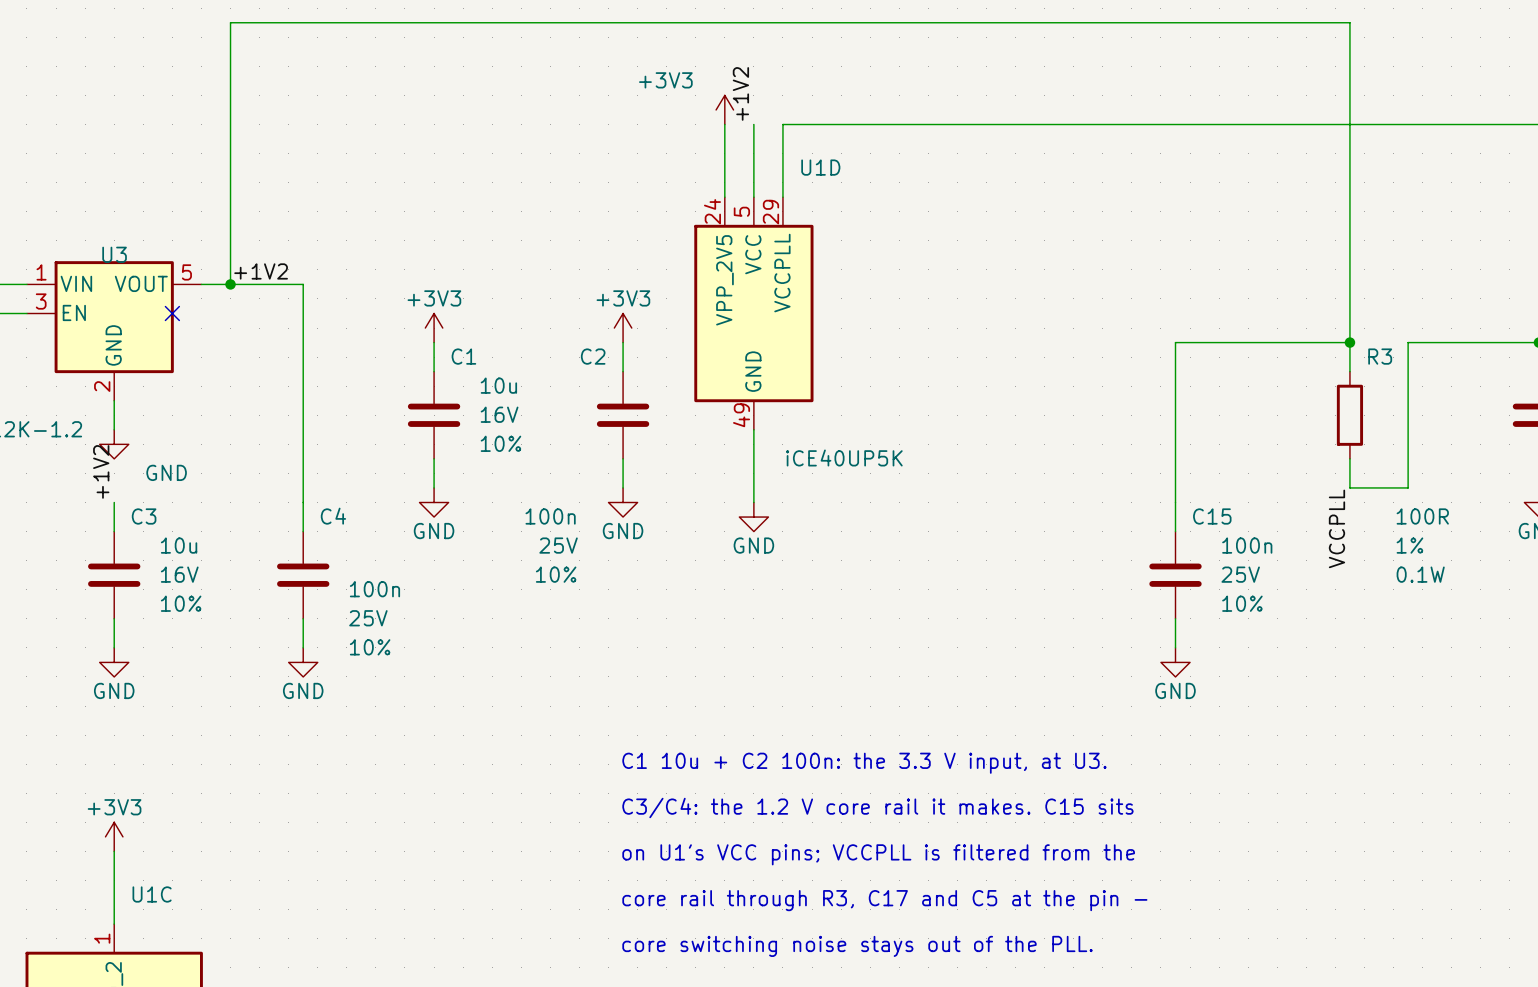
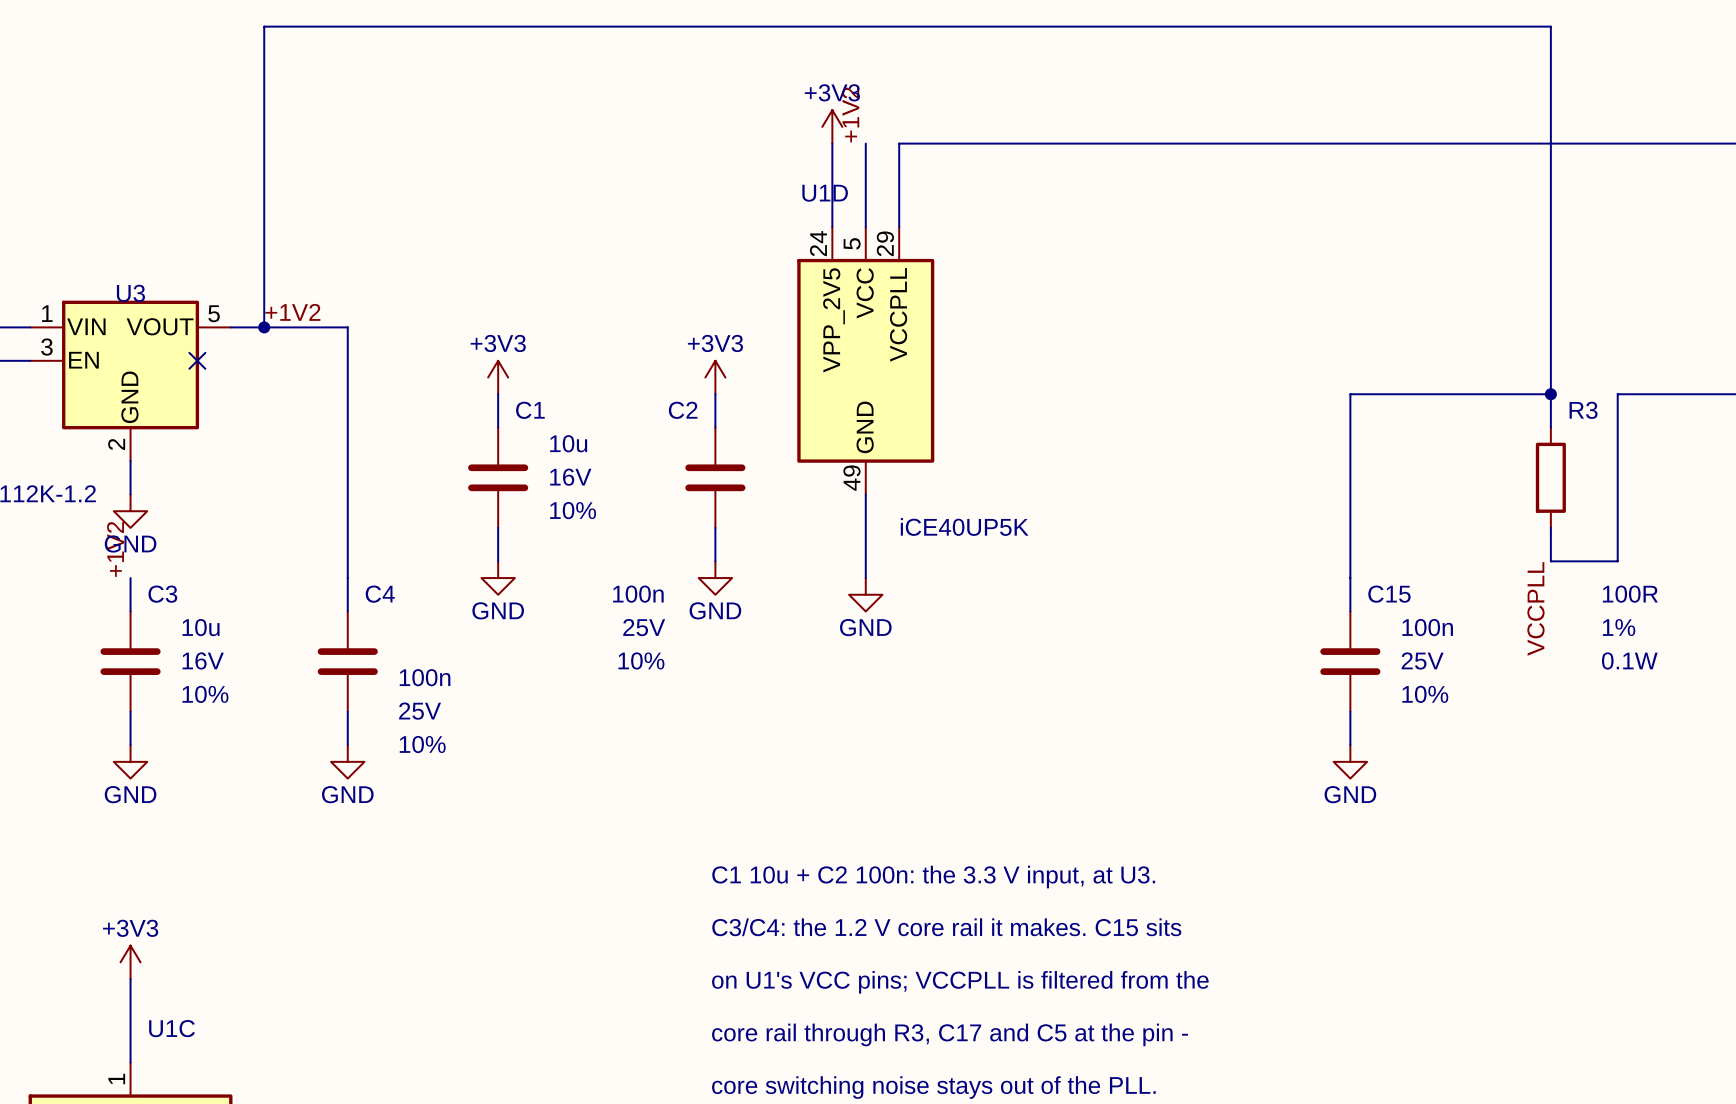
power symbol text position: +3V3 (665, 80) -> +3V3 (832, 92)
U1D name position: U1D (820, 167) -> U1D (825, 193)
power symbol text position: GND (166, 472) -> GND (130, 544)

